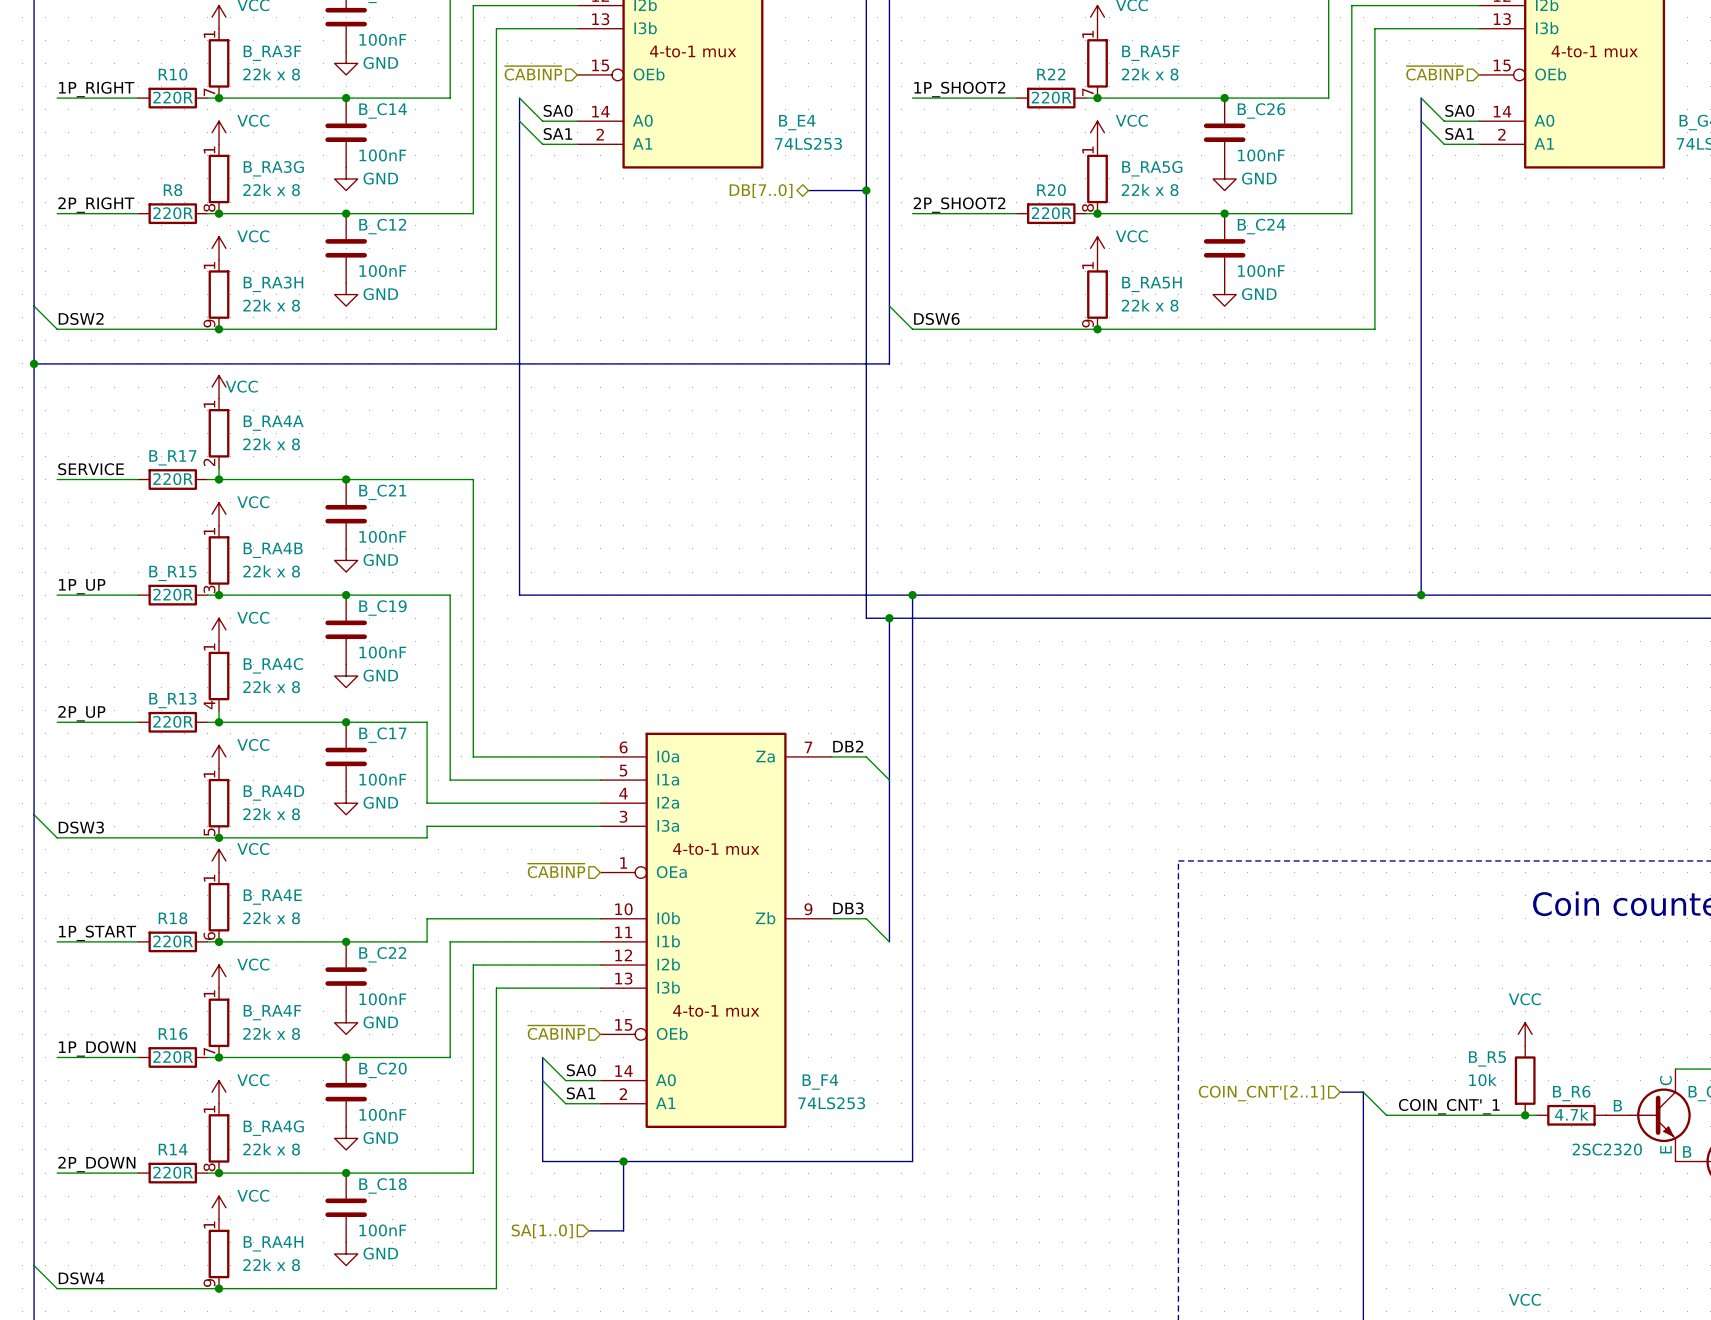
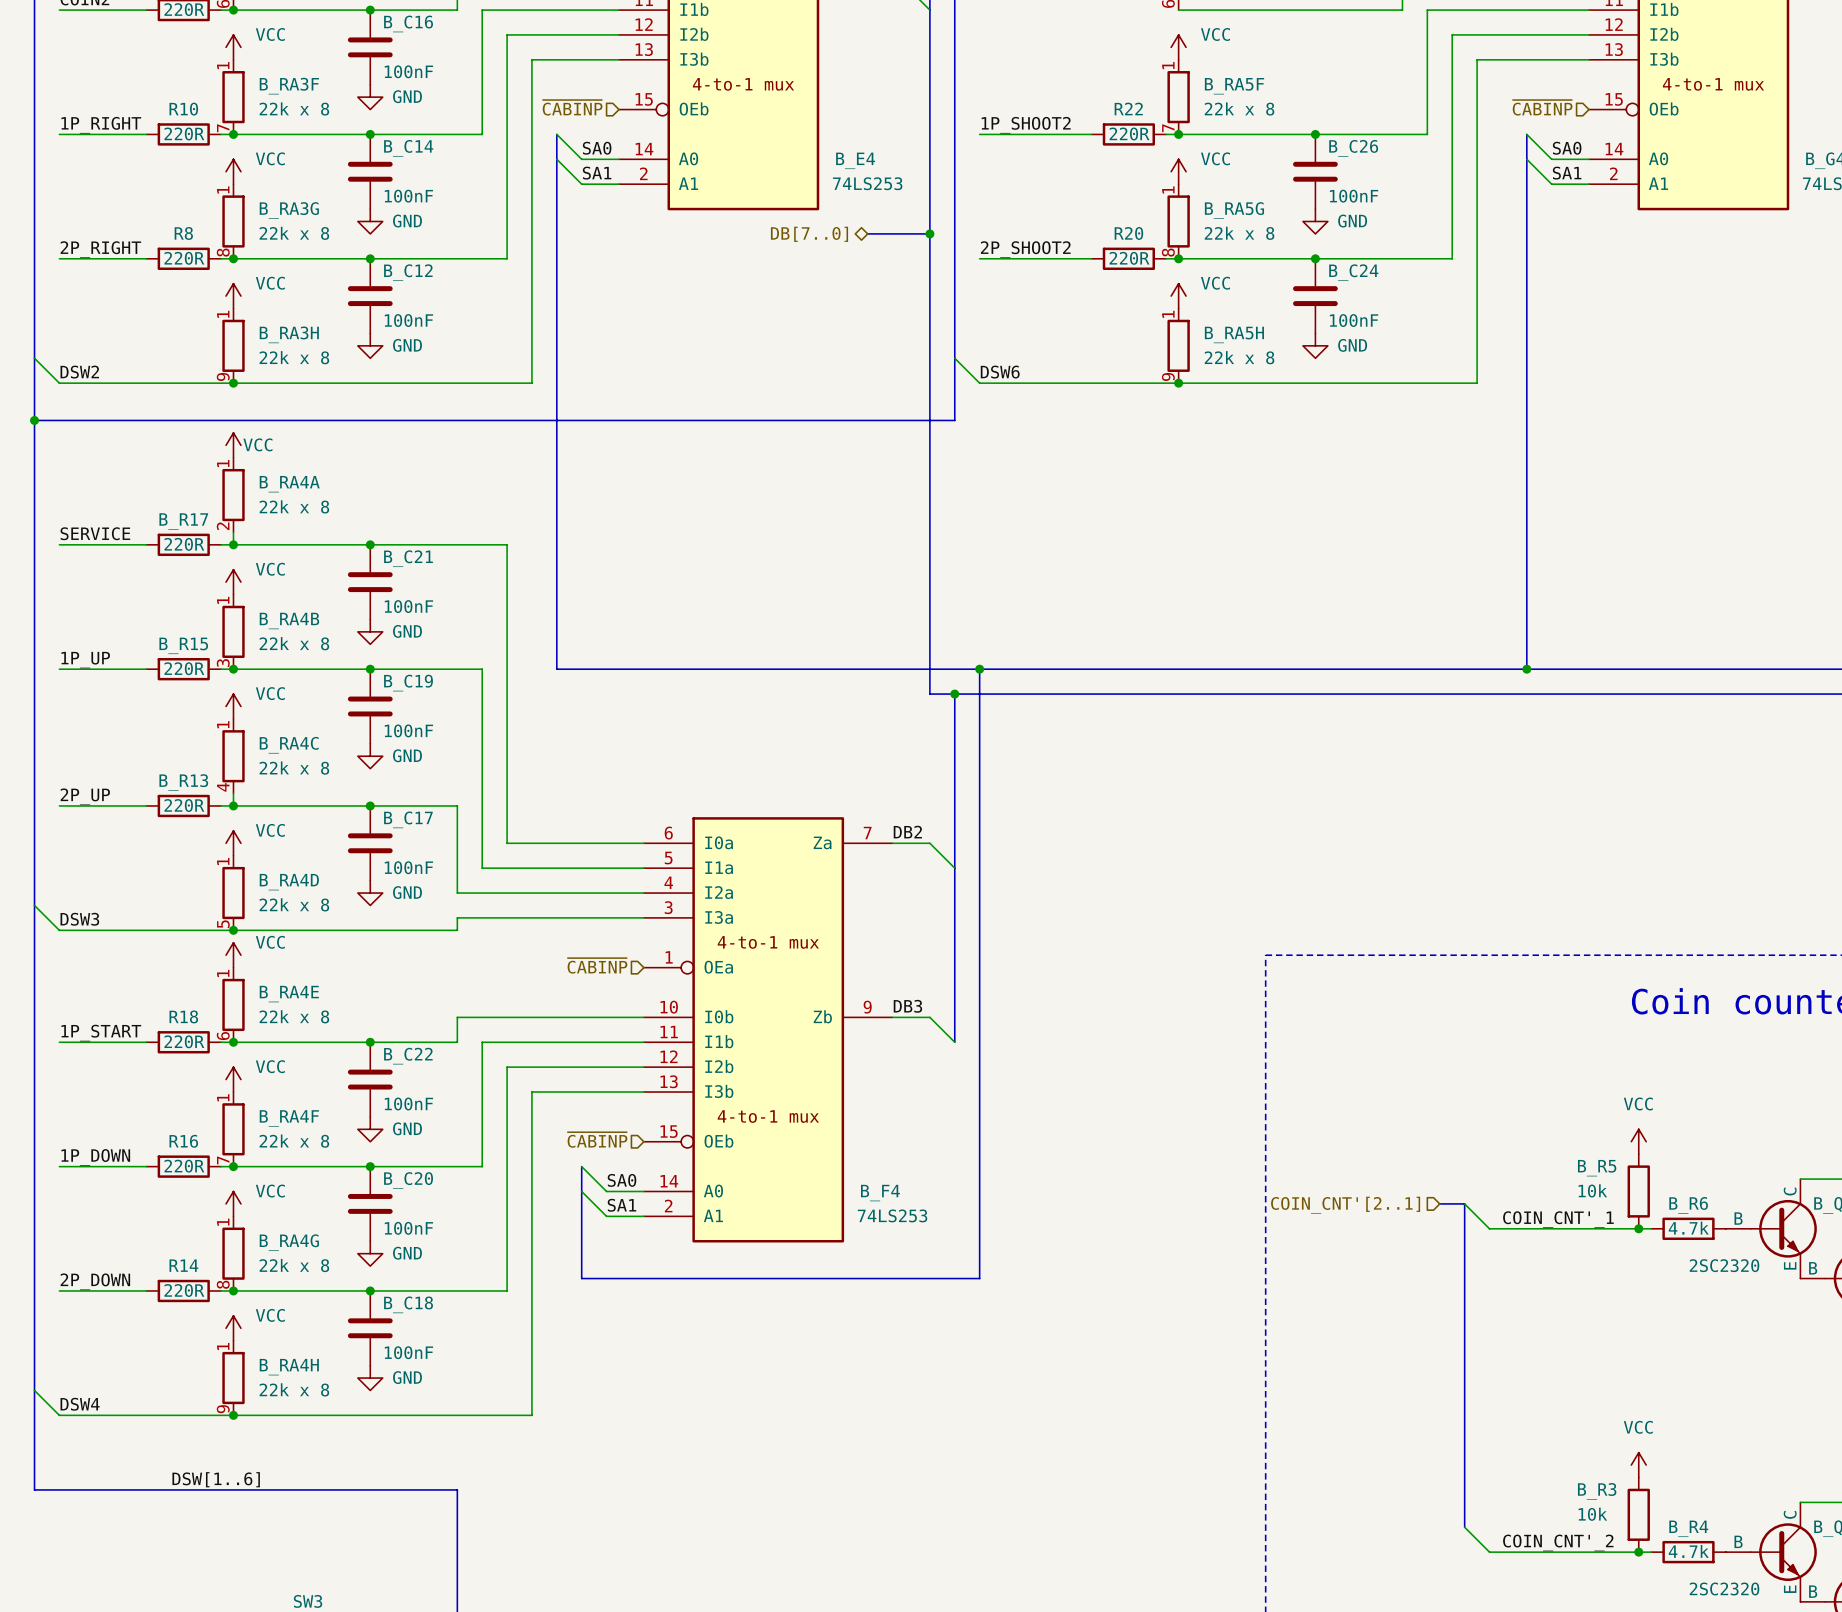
bus: (623, 1161) (623, 1230) (588, 1230) -> none
junction: (623, 1161) -> none
hierarchical label: SA[1..0] (542, 1231) -> none

